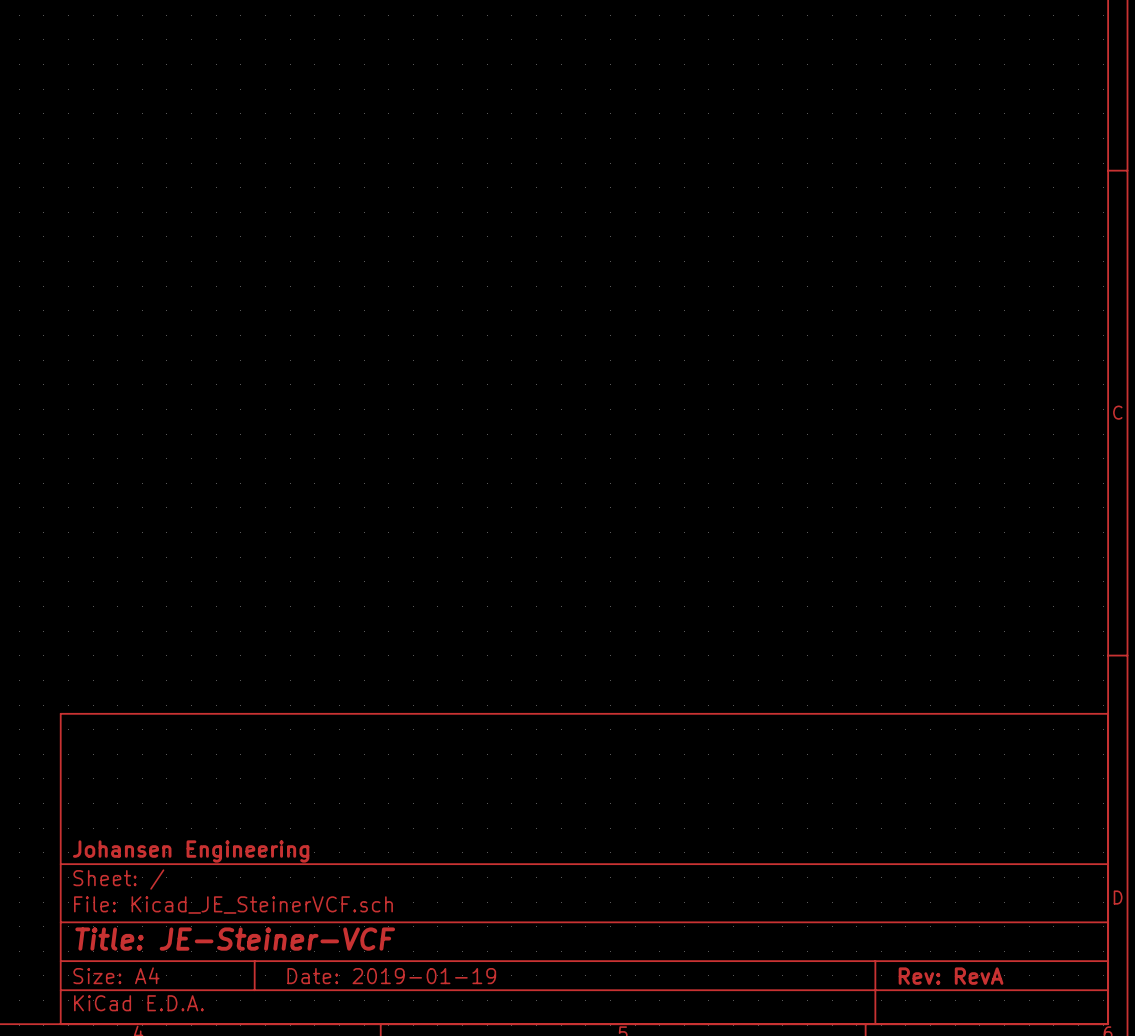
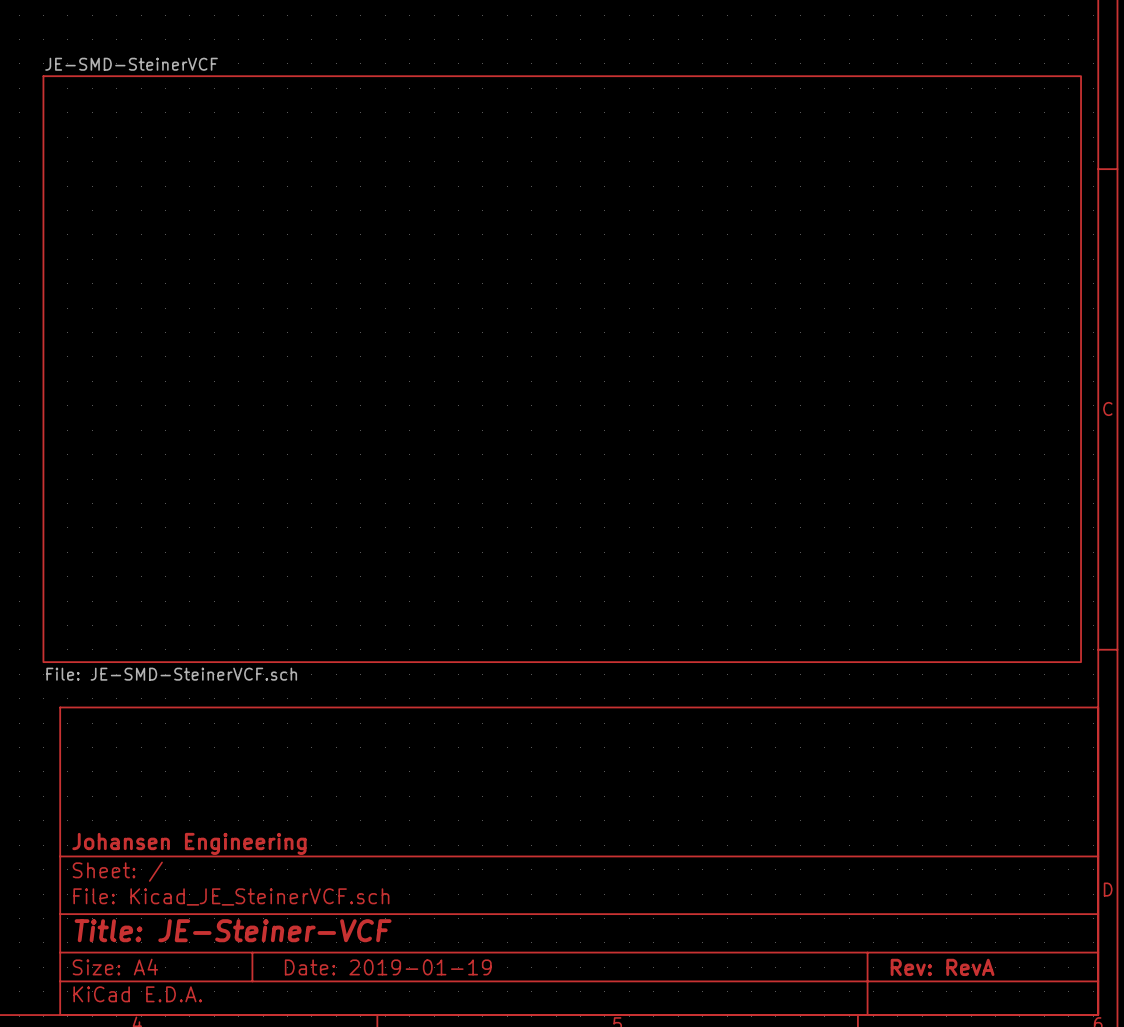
sheet JE-SMD-SteinerVCF: none -> File: JE-SMD-SteinerVCF.sch (562, 369)

